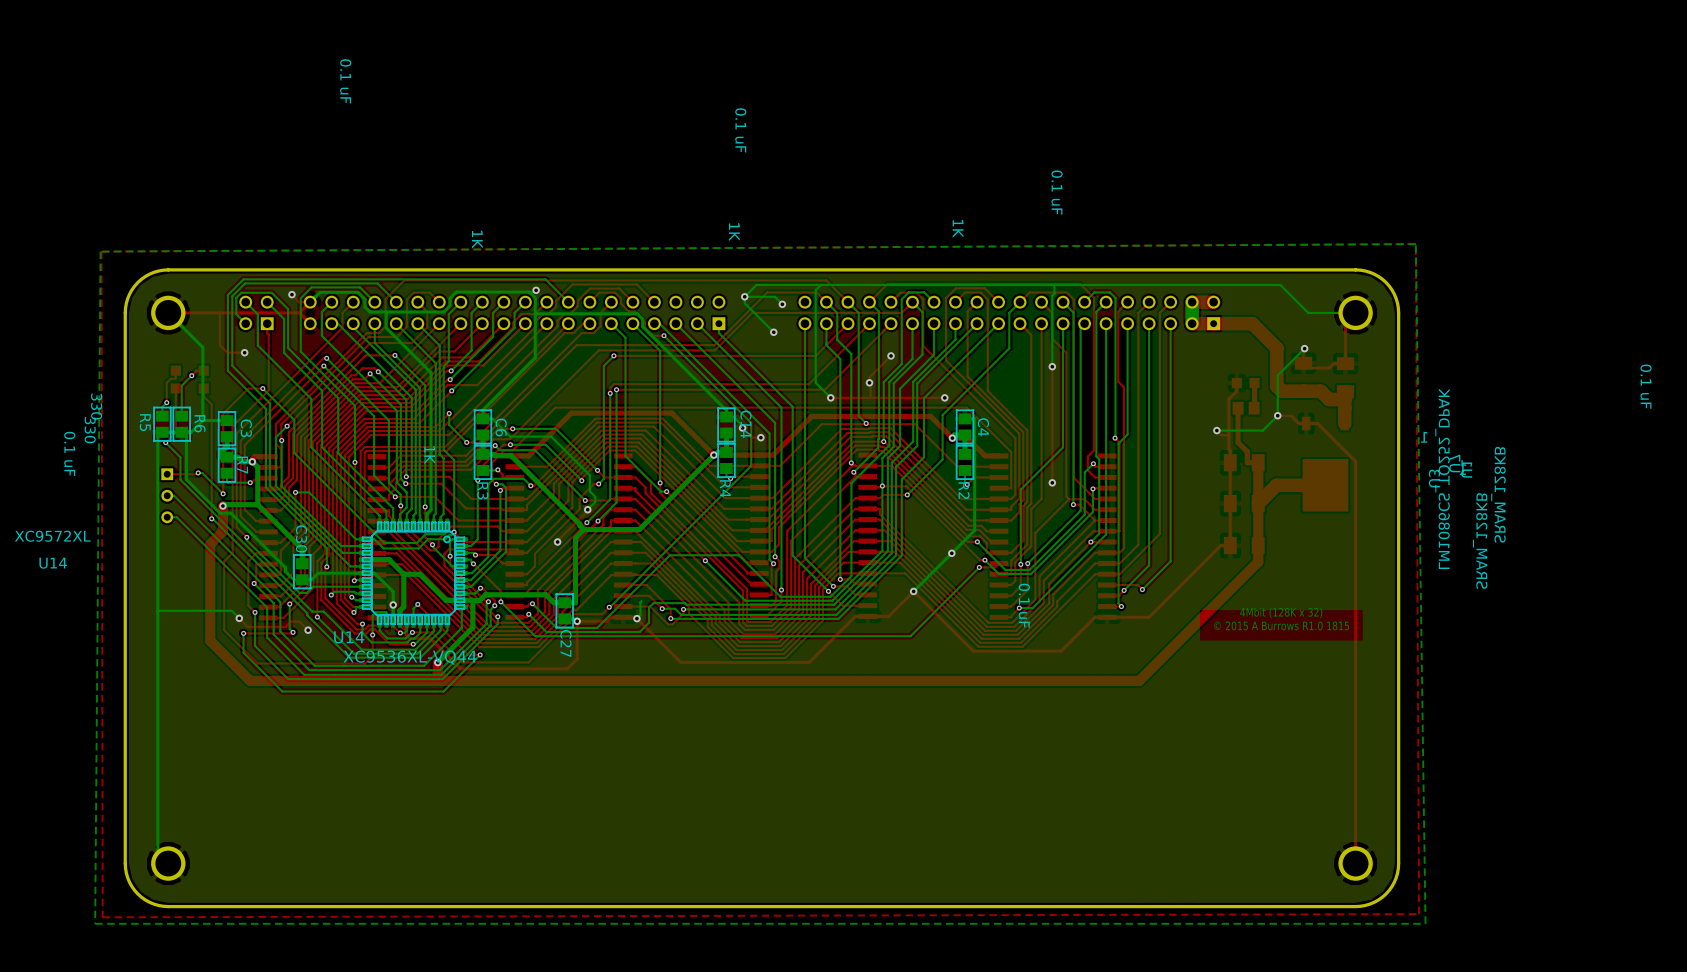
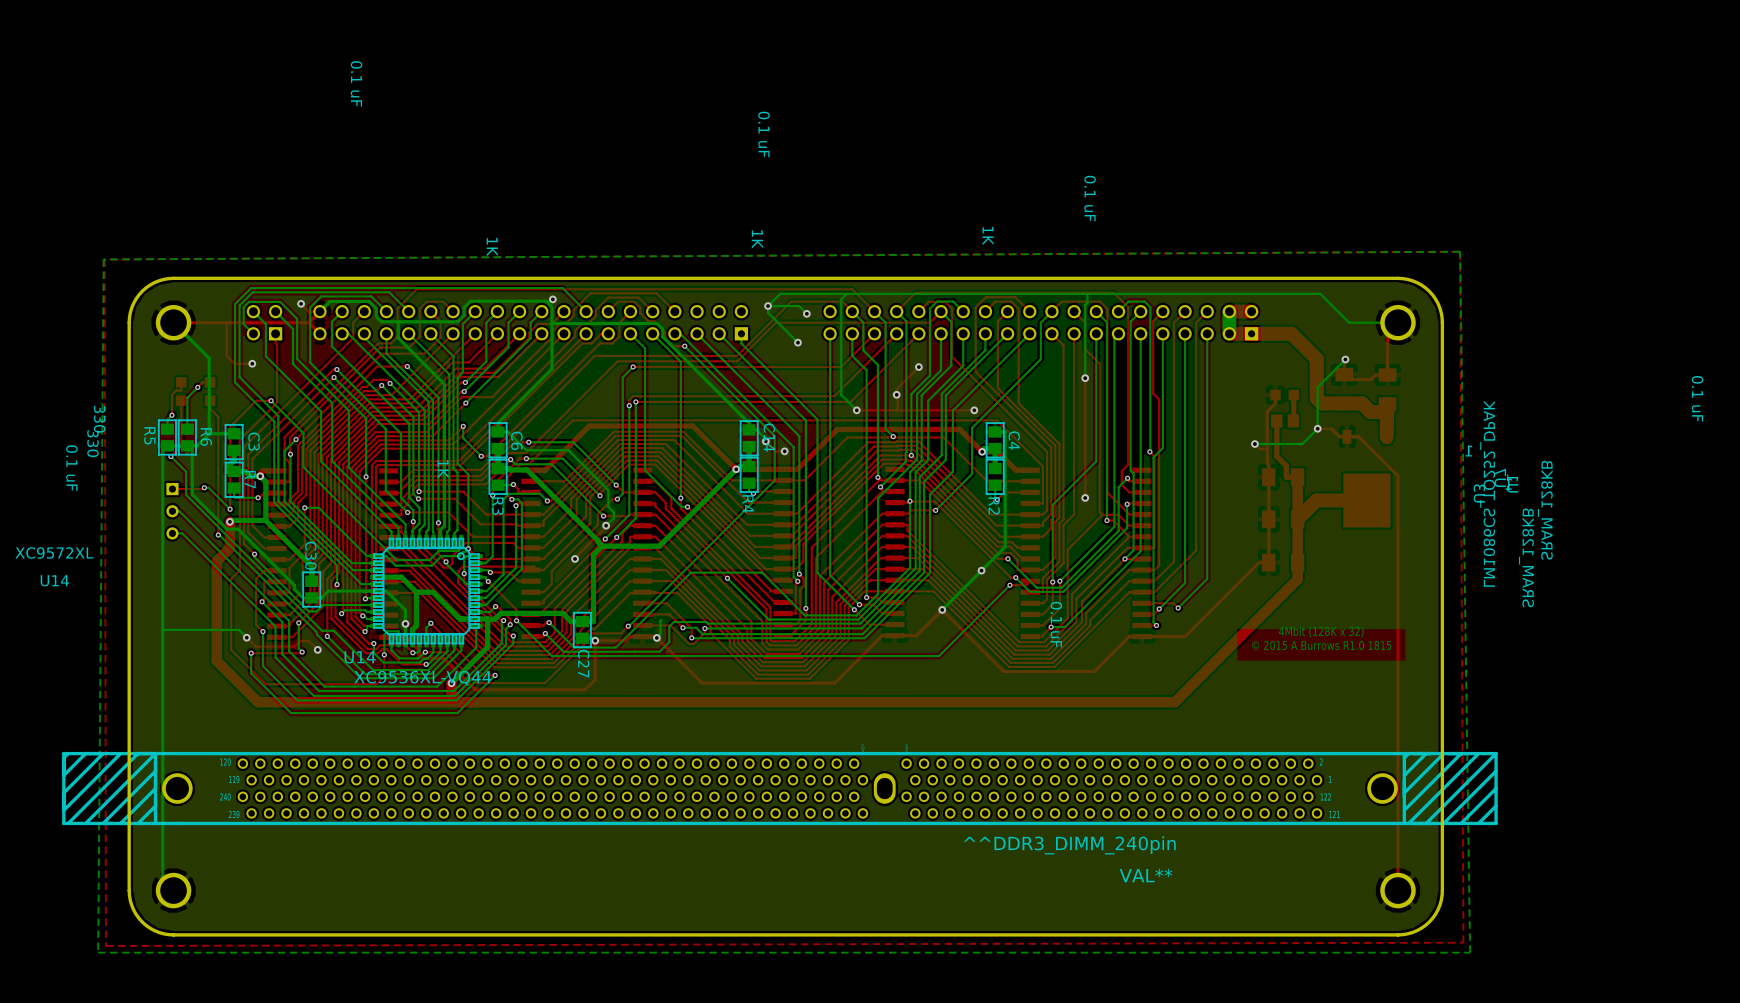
^^DDR3_DIMM_240pin: none -> VAL** (779, 788)

